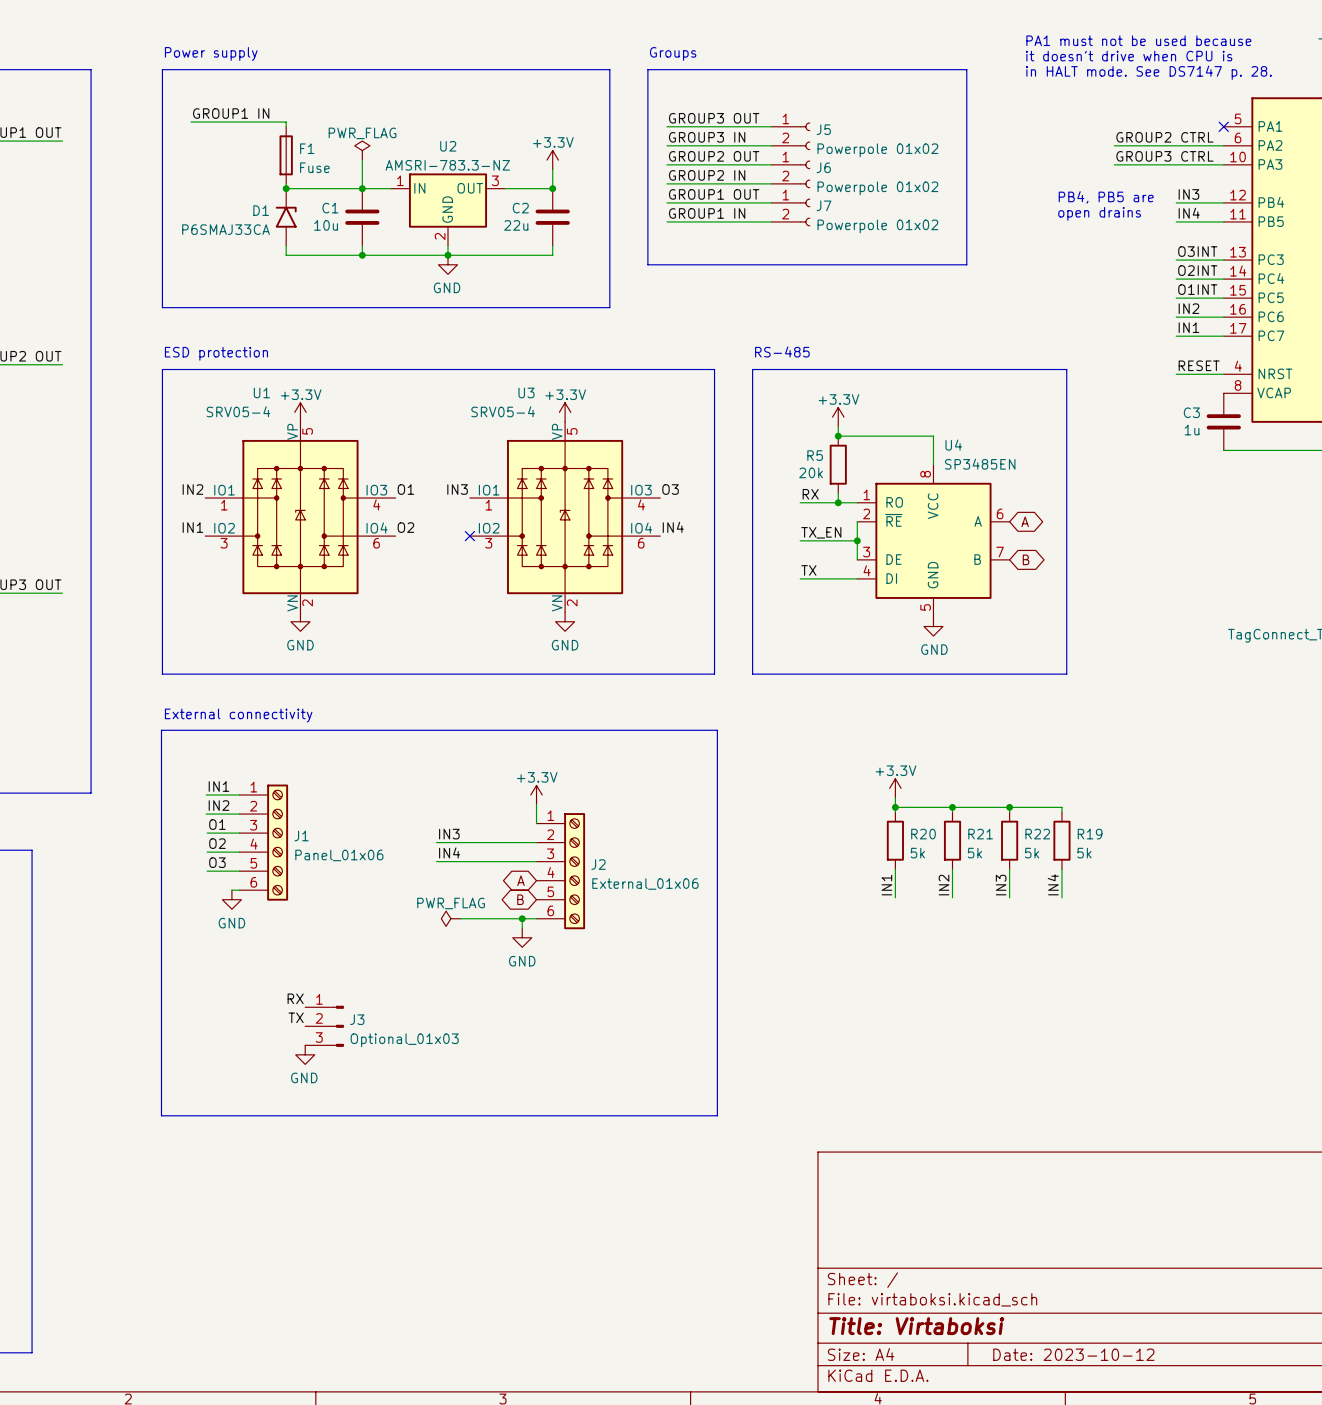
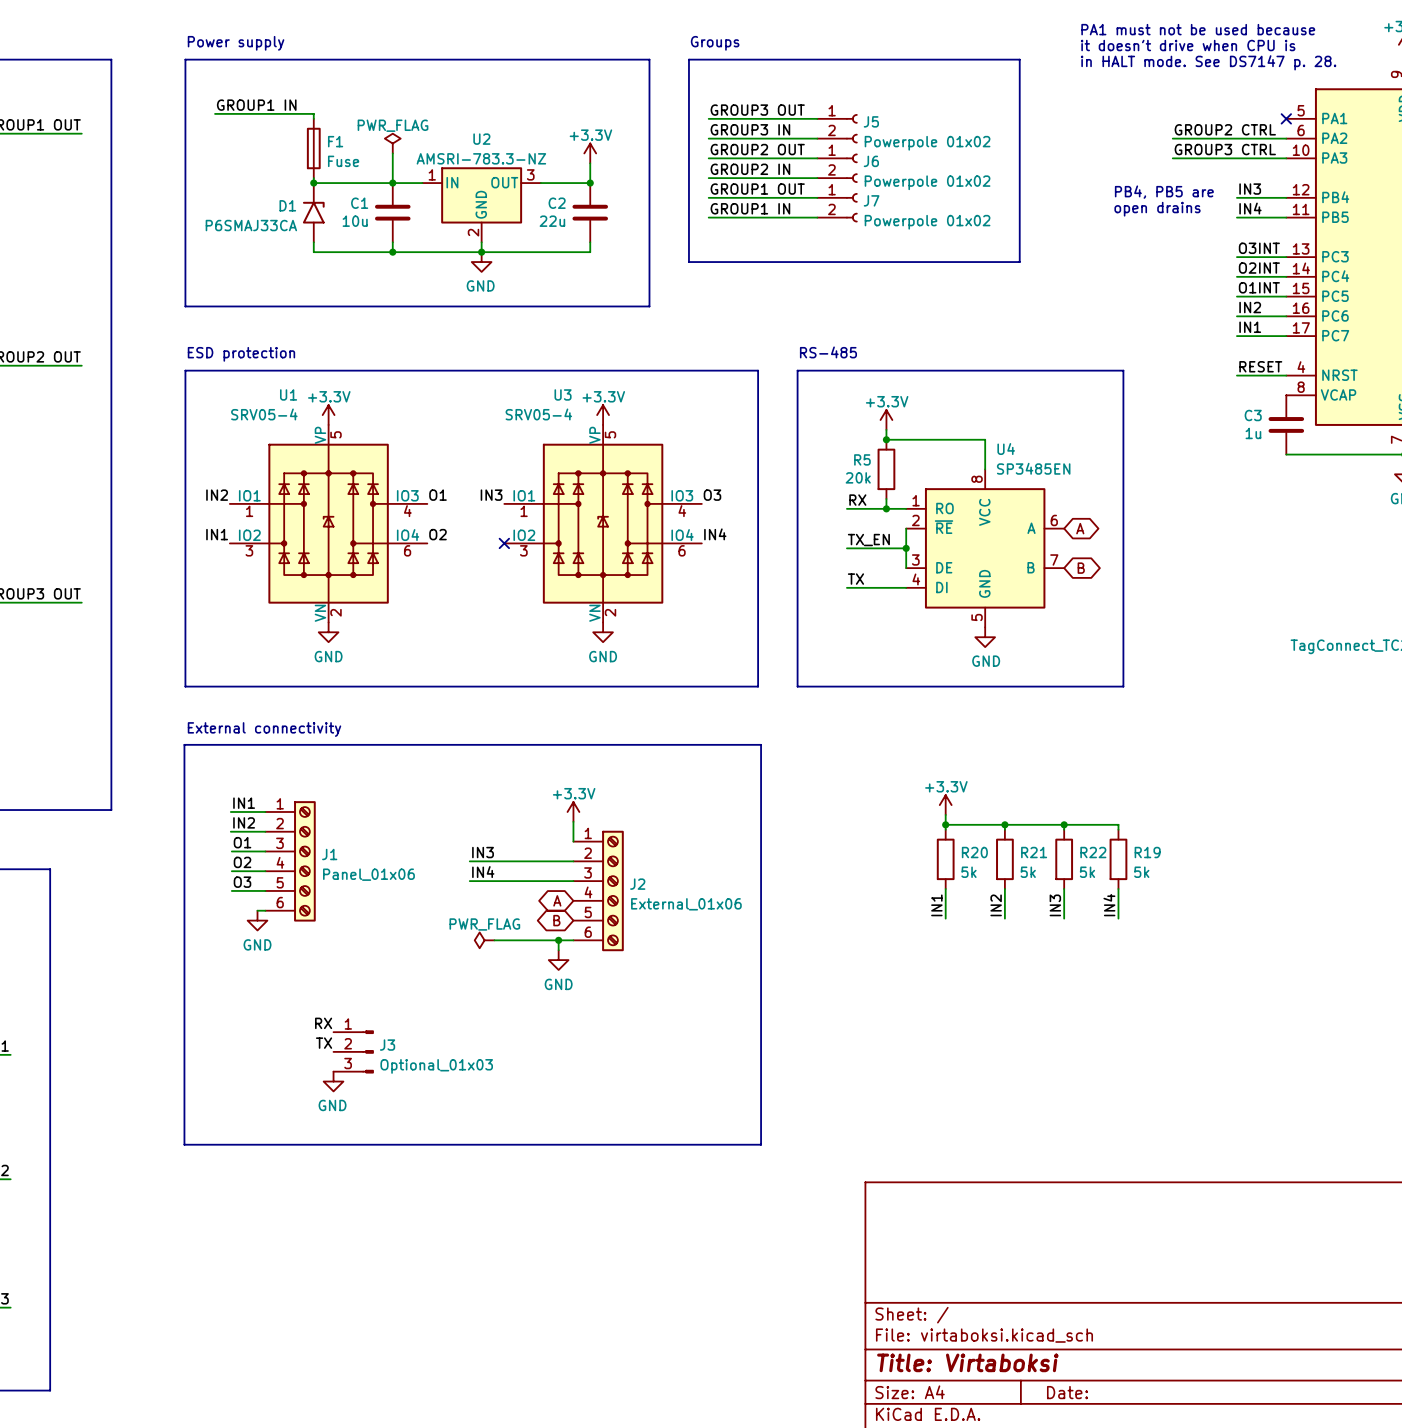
title block: Date: 2023-10-12 (1073, 1354) -> Date: (1067, 1392)

